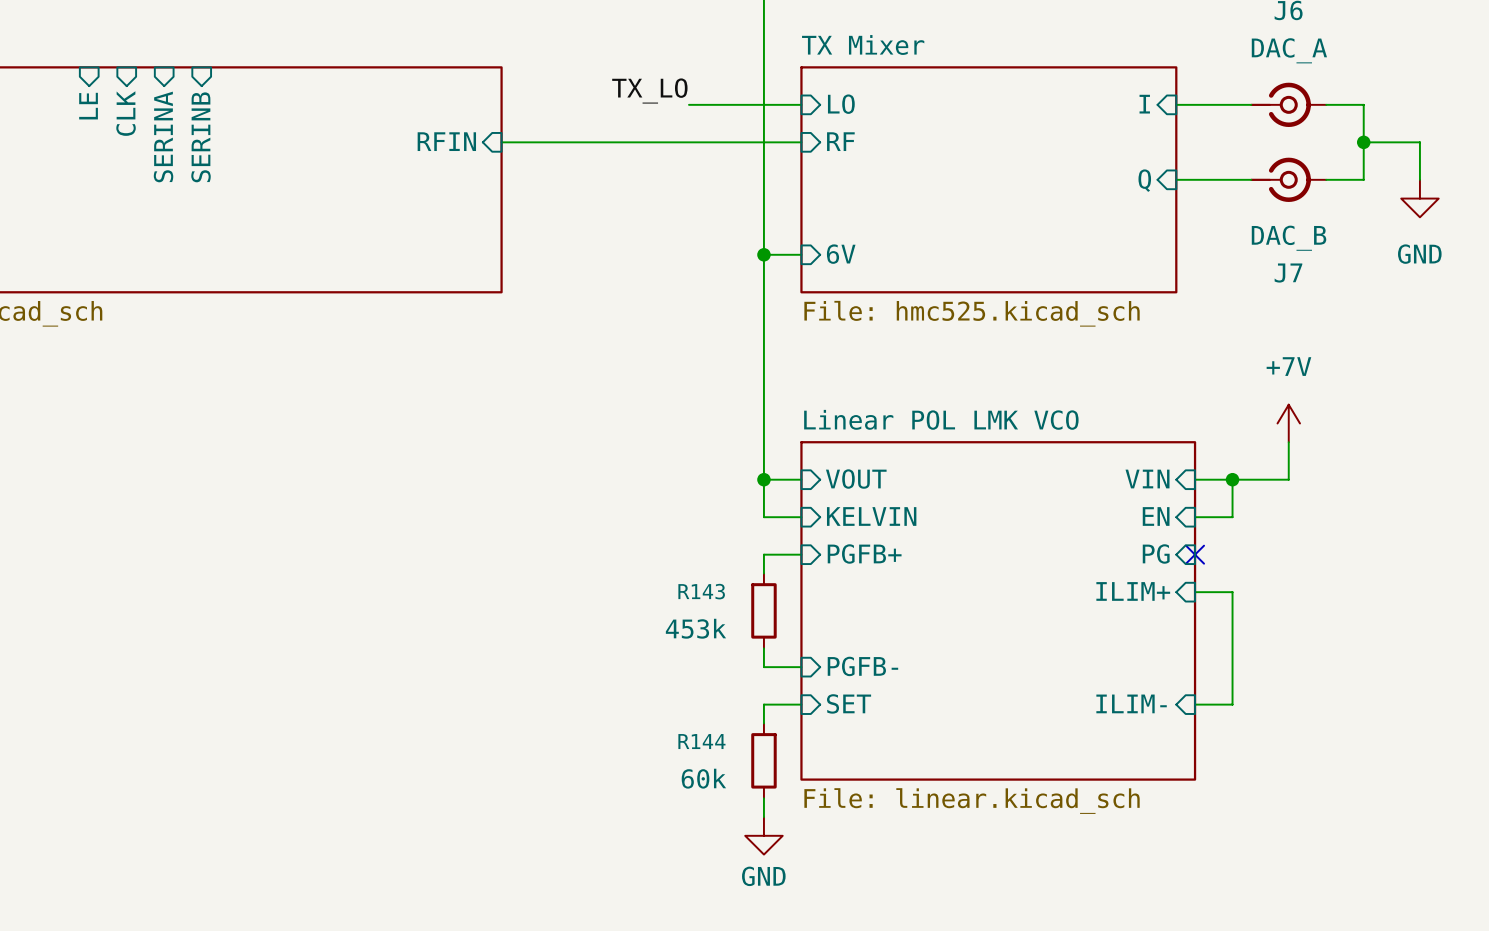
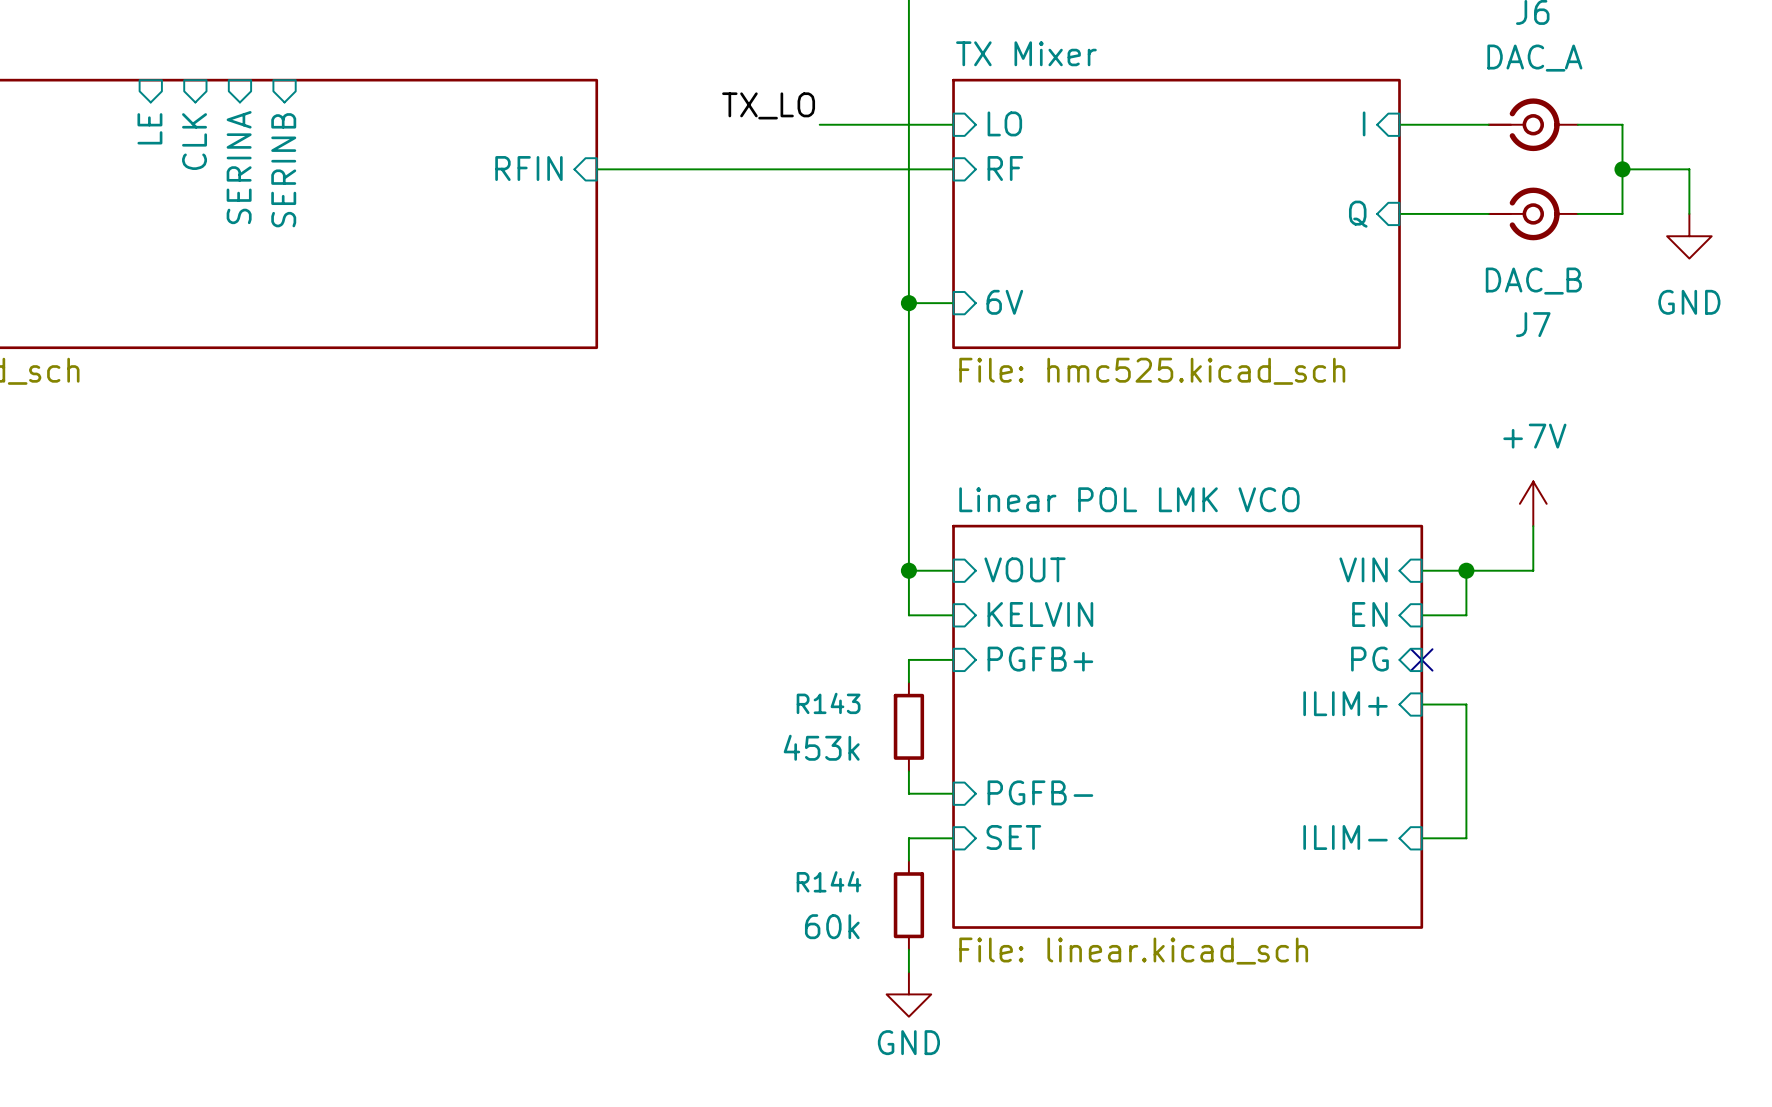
sheet pin: LE (88, 106) -> none
sheet pin: CLK (126, 113) -> LE (149, 128)
sheet pin: SERINA (163, 136) -> CLK (194, 141)
sheet pin: SERINB (201, 137) -> SERINA (239, 167)
sheet pin: none -> SERINB (283, 170)

